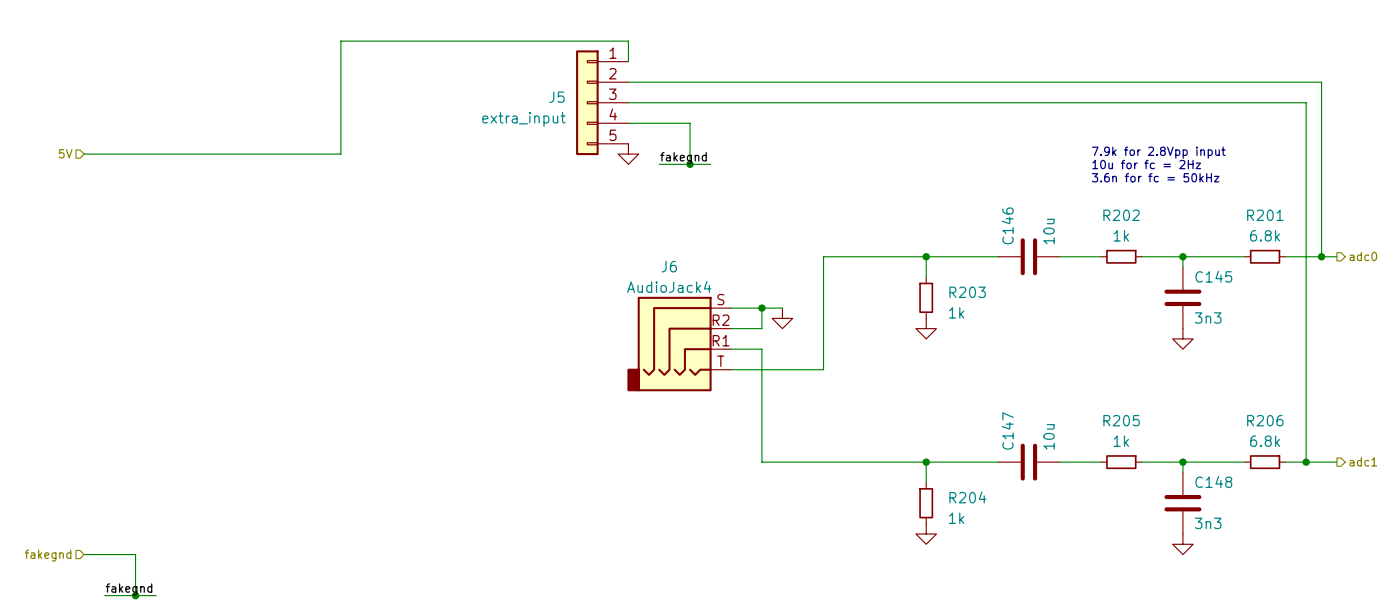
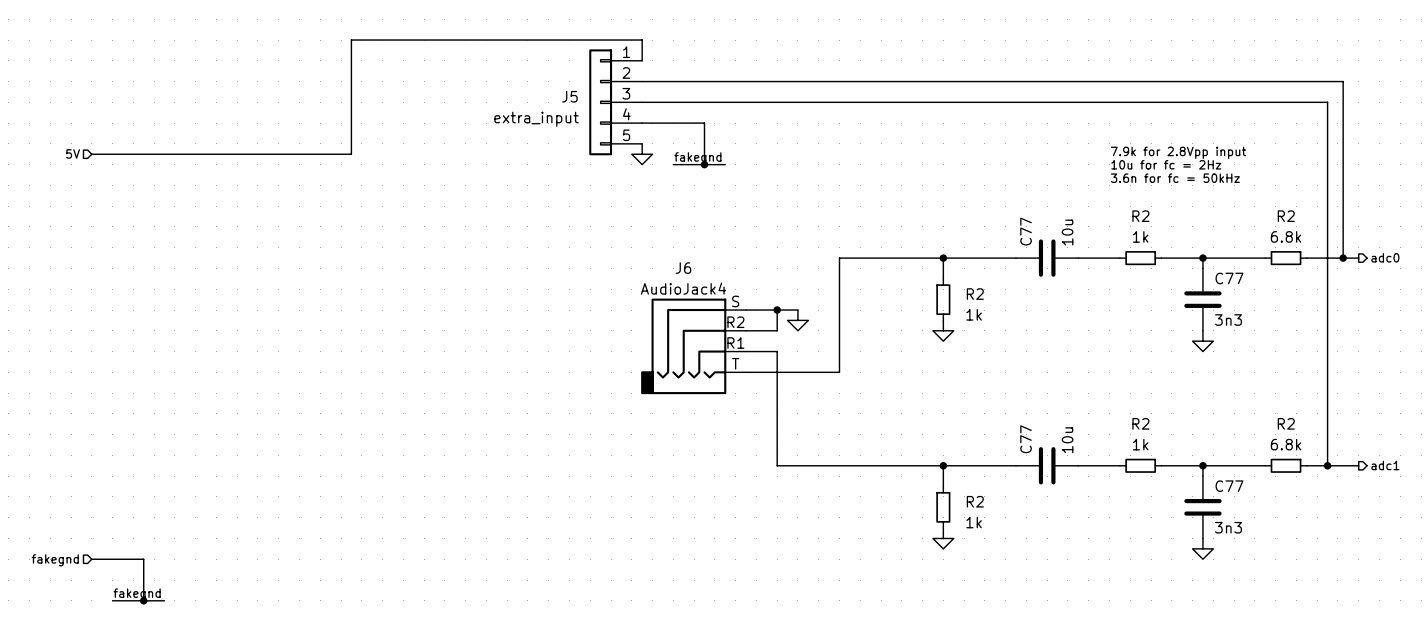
R202 name: R202 (1121, 215) -> R2 (1140, 216)
R201 name: R201 (1265, 215) -> R2 (1286, 216)
C146 name: C146 (1007, 225) -> C77 (1026, 231)
C145 name: C145 (1213, 276) -> C77 (1229, 278)
R203 name: R203 (967, 292) -> R2 (975, 294)
R205 name: R205 (1121, 420) -> R2 (1140, 423)
R206 name: R206 (1265, 420) -> R2 (1286, 423)
C147 name: C147 (1007, 431) -> C77 (1026, 439)
C148 name: C148 (1213, 482) -> C77 (1229, 486)
R204 name: R204 (967, 497) -> R2 (975, 501)

